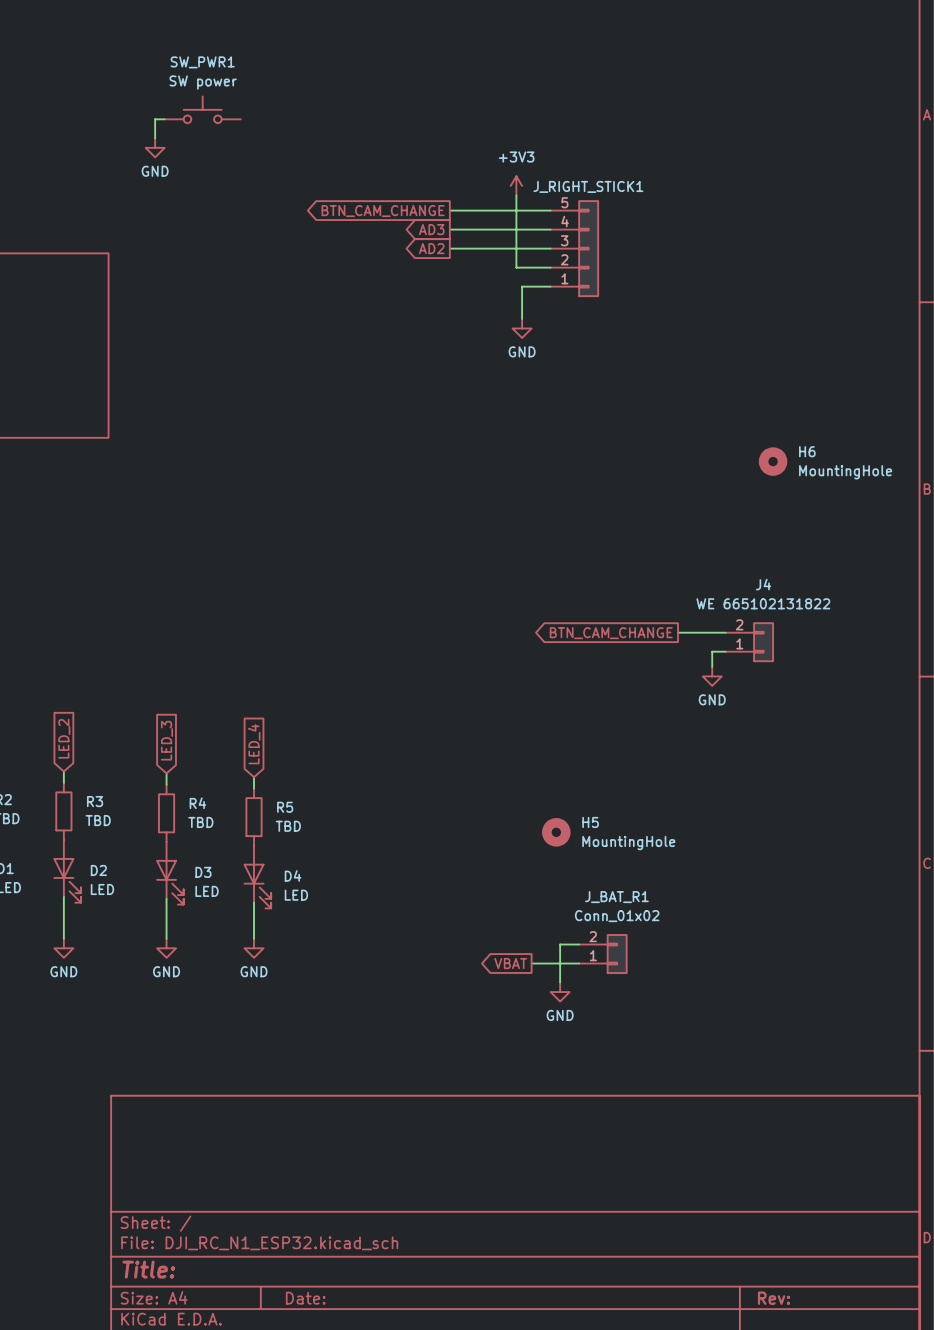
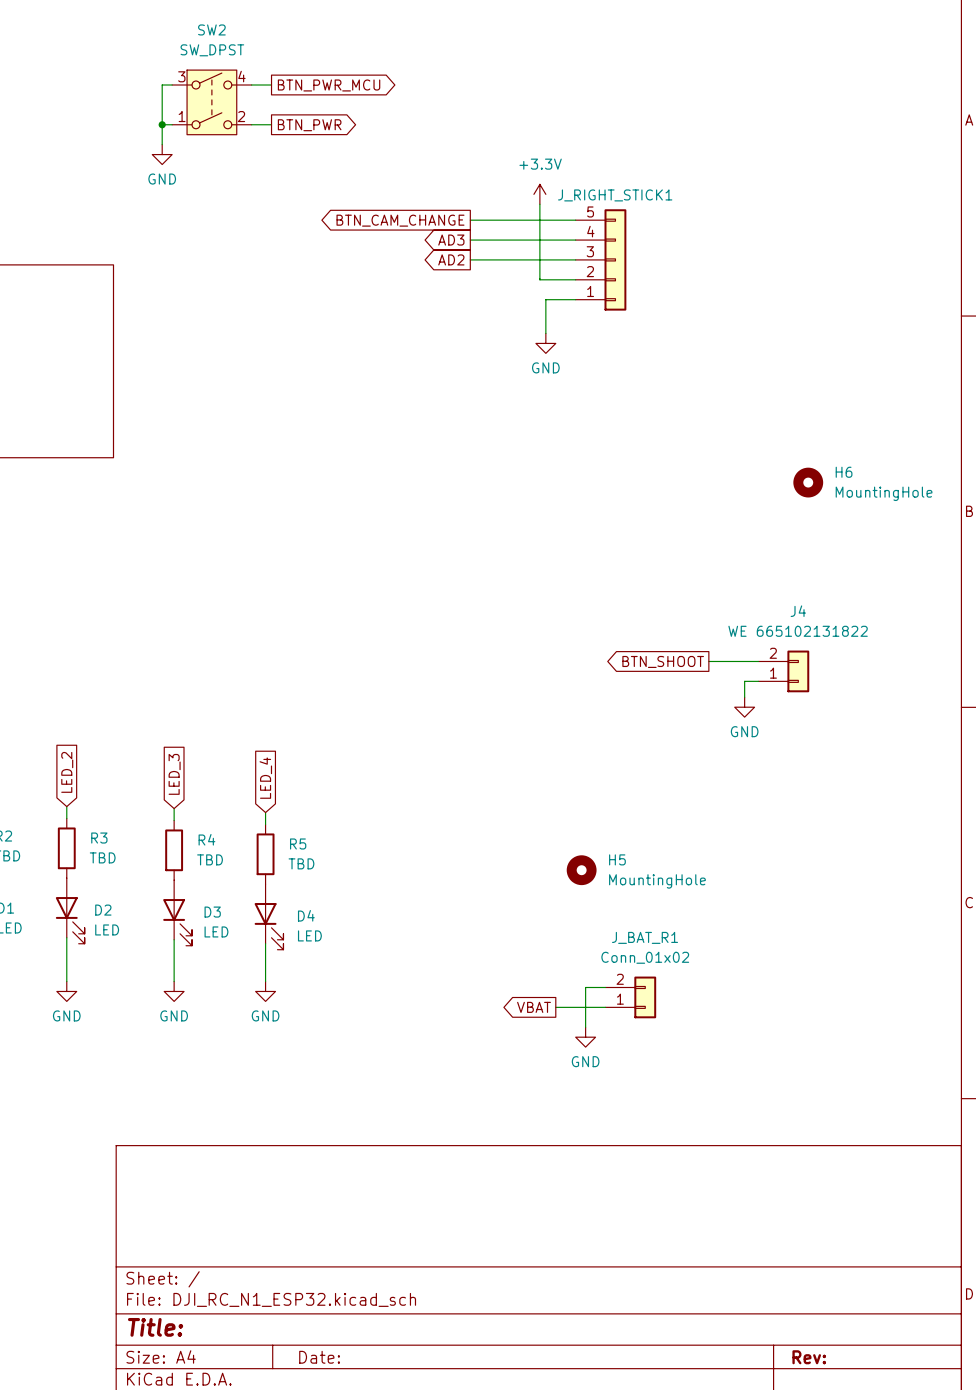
wire: none -> (172, 85) (162, 85) (162, 124)
wire: none -> (251, 85) (271, 85)
global label: none -> BTN_PWR_MCU (329, 85)
SW2: none -> SW_DPST (211, 102)
SW_PWR1: SW power (202, 109) -> none
junction: none -> (162, 124)
wire: none -> (251, 124) (271, 124)
global label: none -> BTN_PWR (309, 125)
power symbol: +3V3 (516, 185) -> +3.3V (539, 194)
global label: BTN_CAM_CHANGE (611, 633) -> BTN_SHOOT (663, 661)

